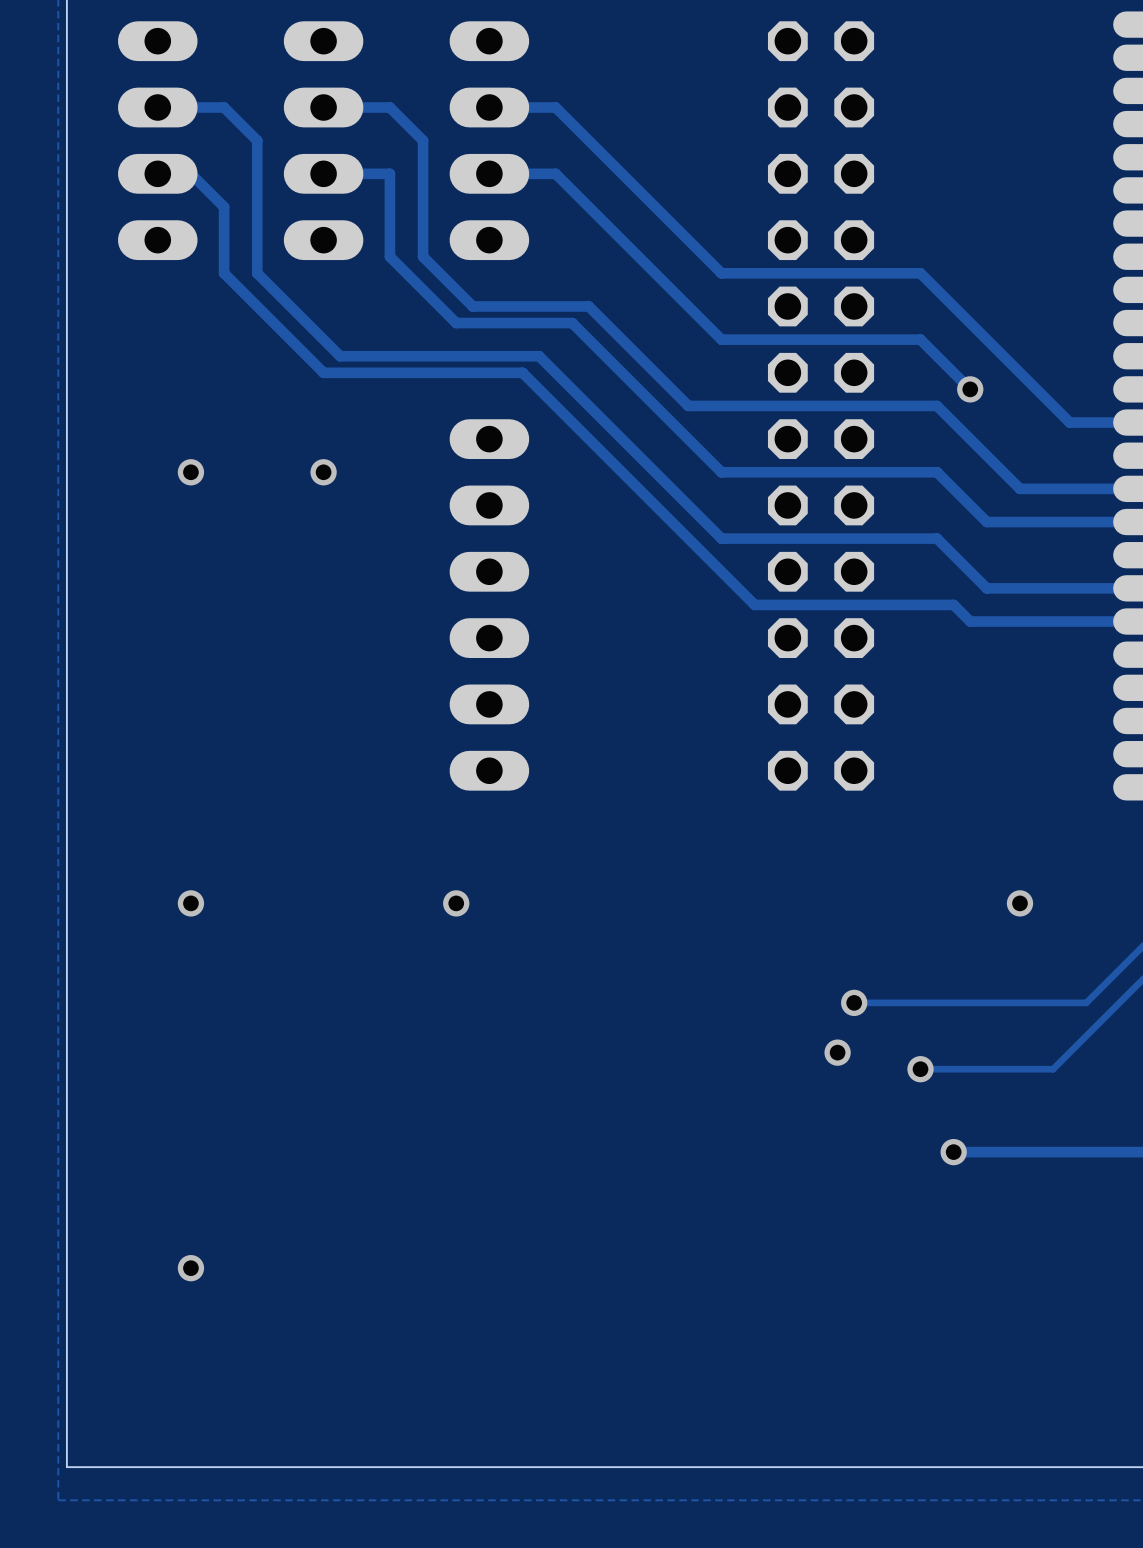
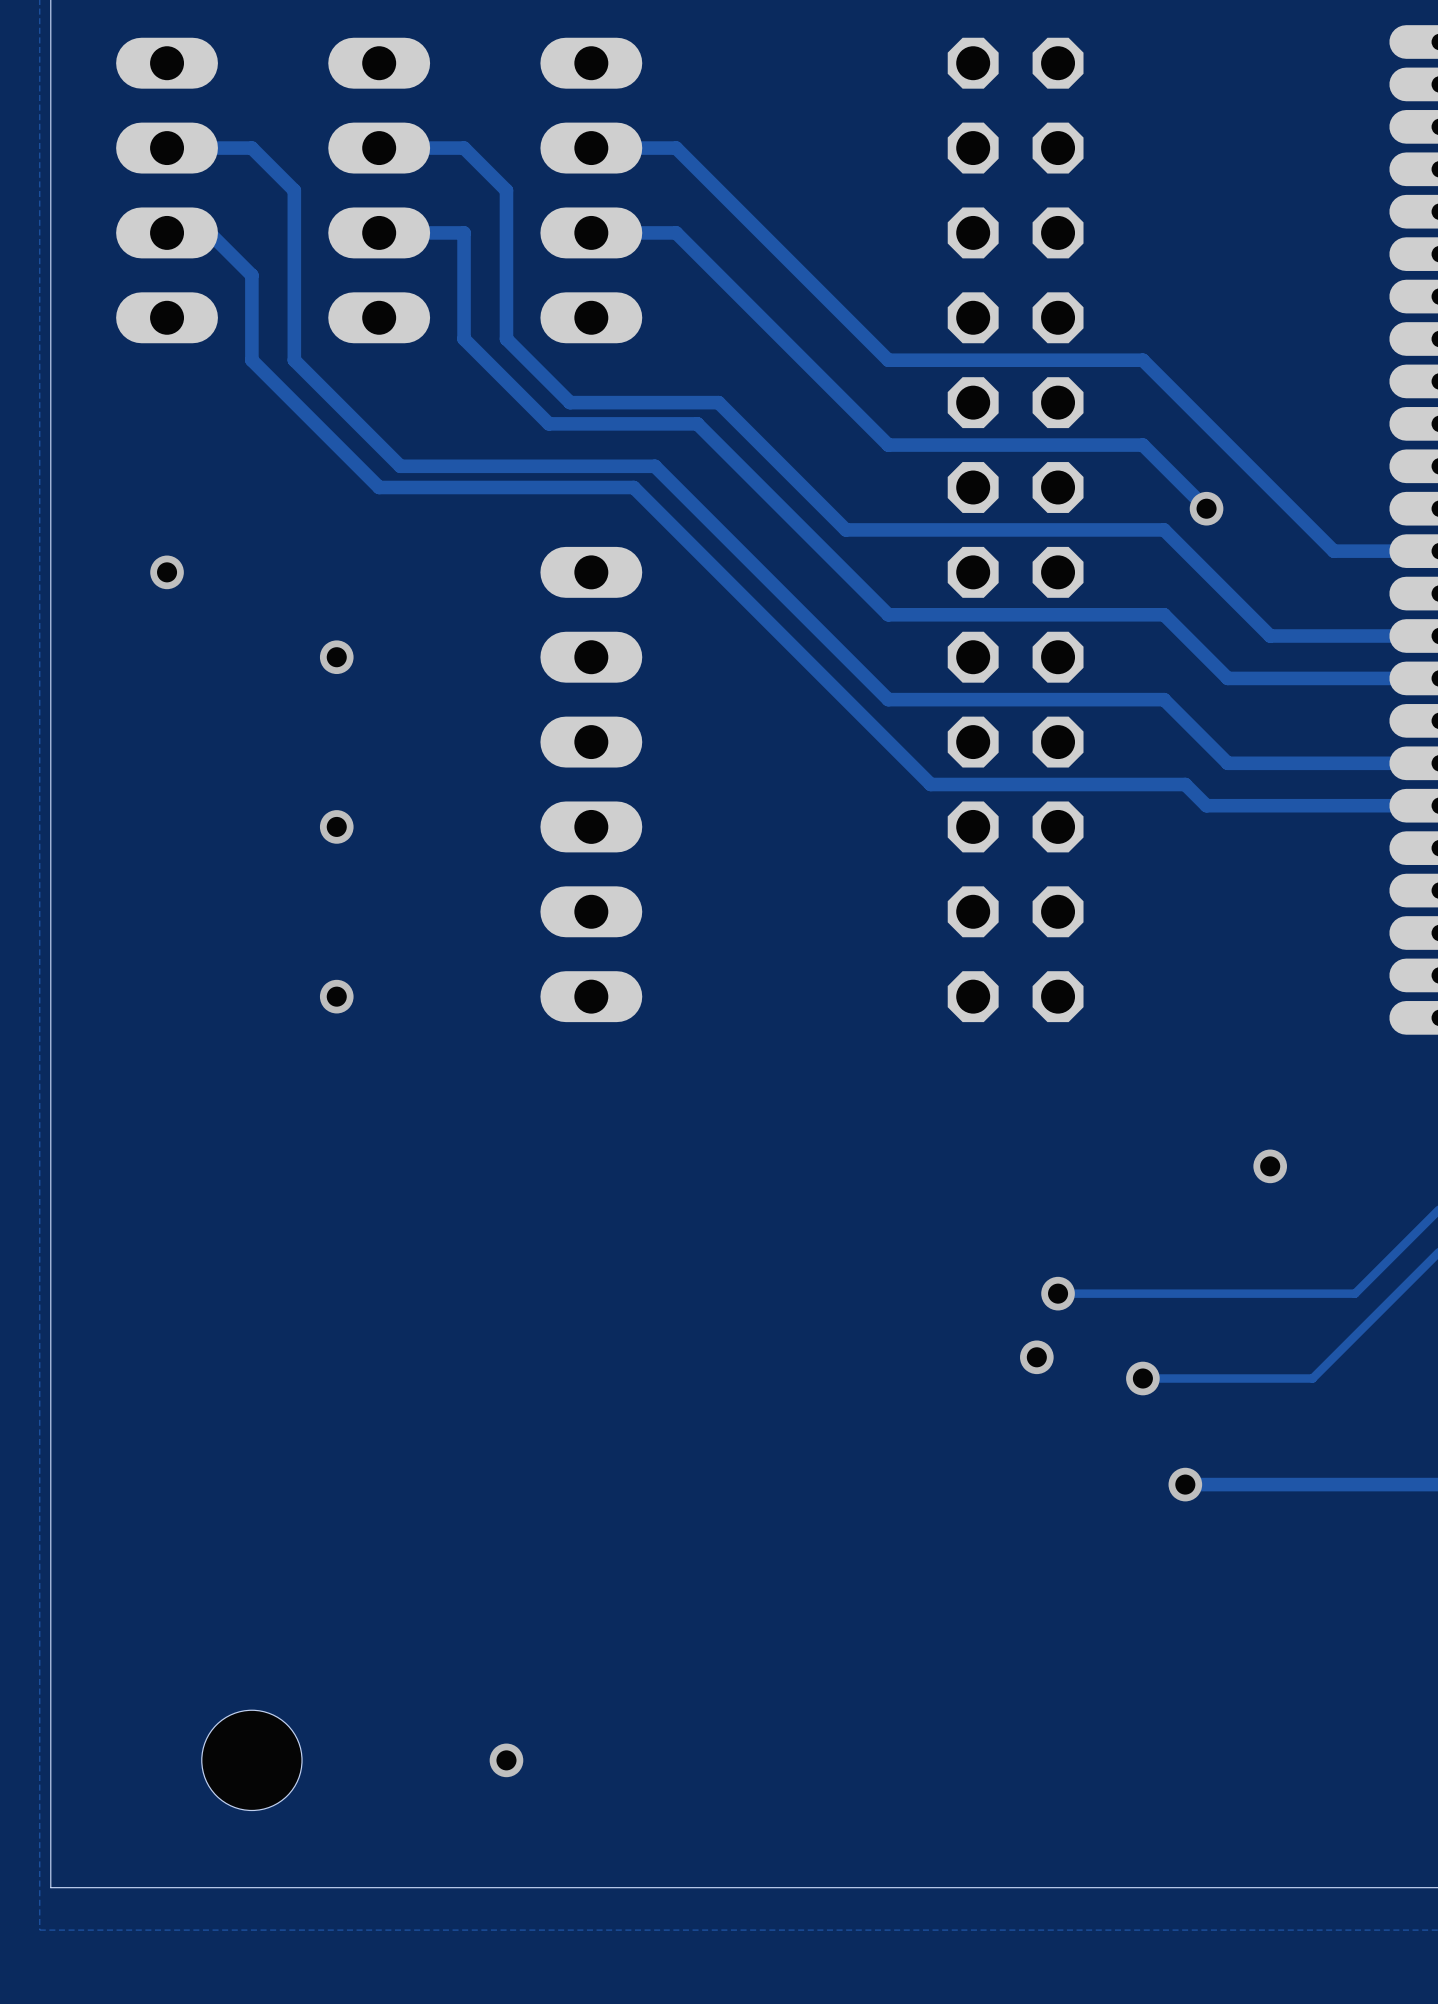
via position: (190, 472) -> (167, 572)
via position: (323, 472) -> (336, 657)
via: none -> (336, 826)
via: none -> (336, 996)
via: (190, 903) -> none
via: (456, 903) -> none
via: (190, 1268) -> none
hole: none -> (251, 1760)
via: none -> (506, 1760)

